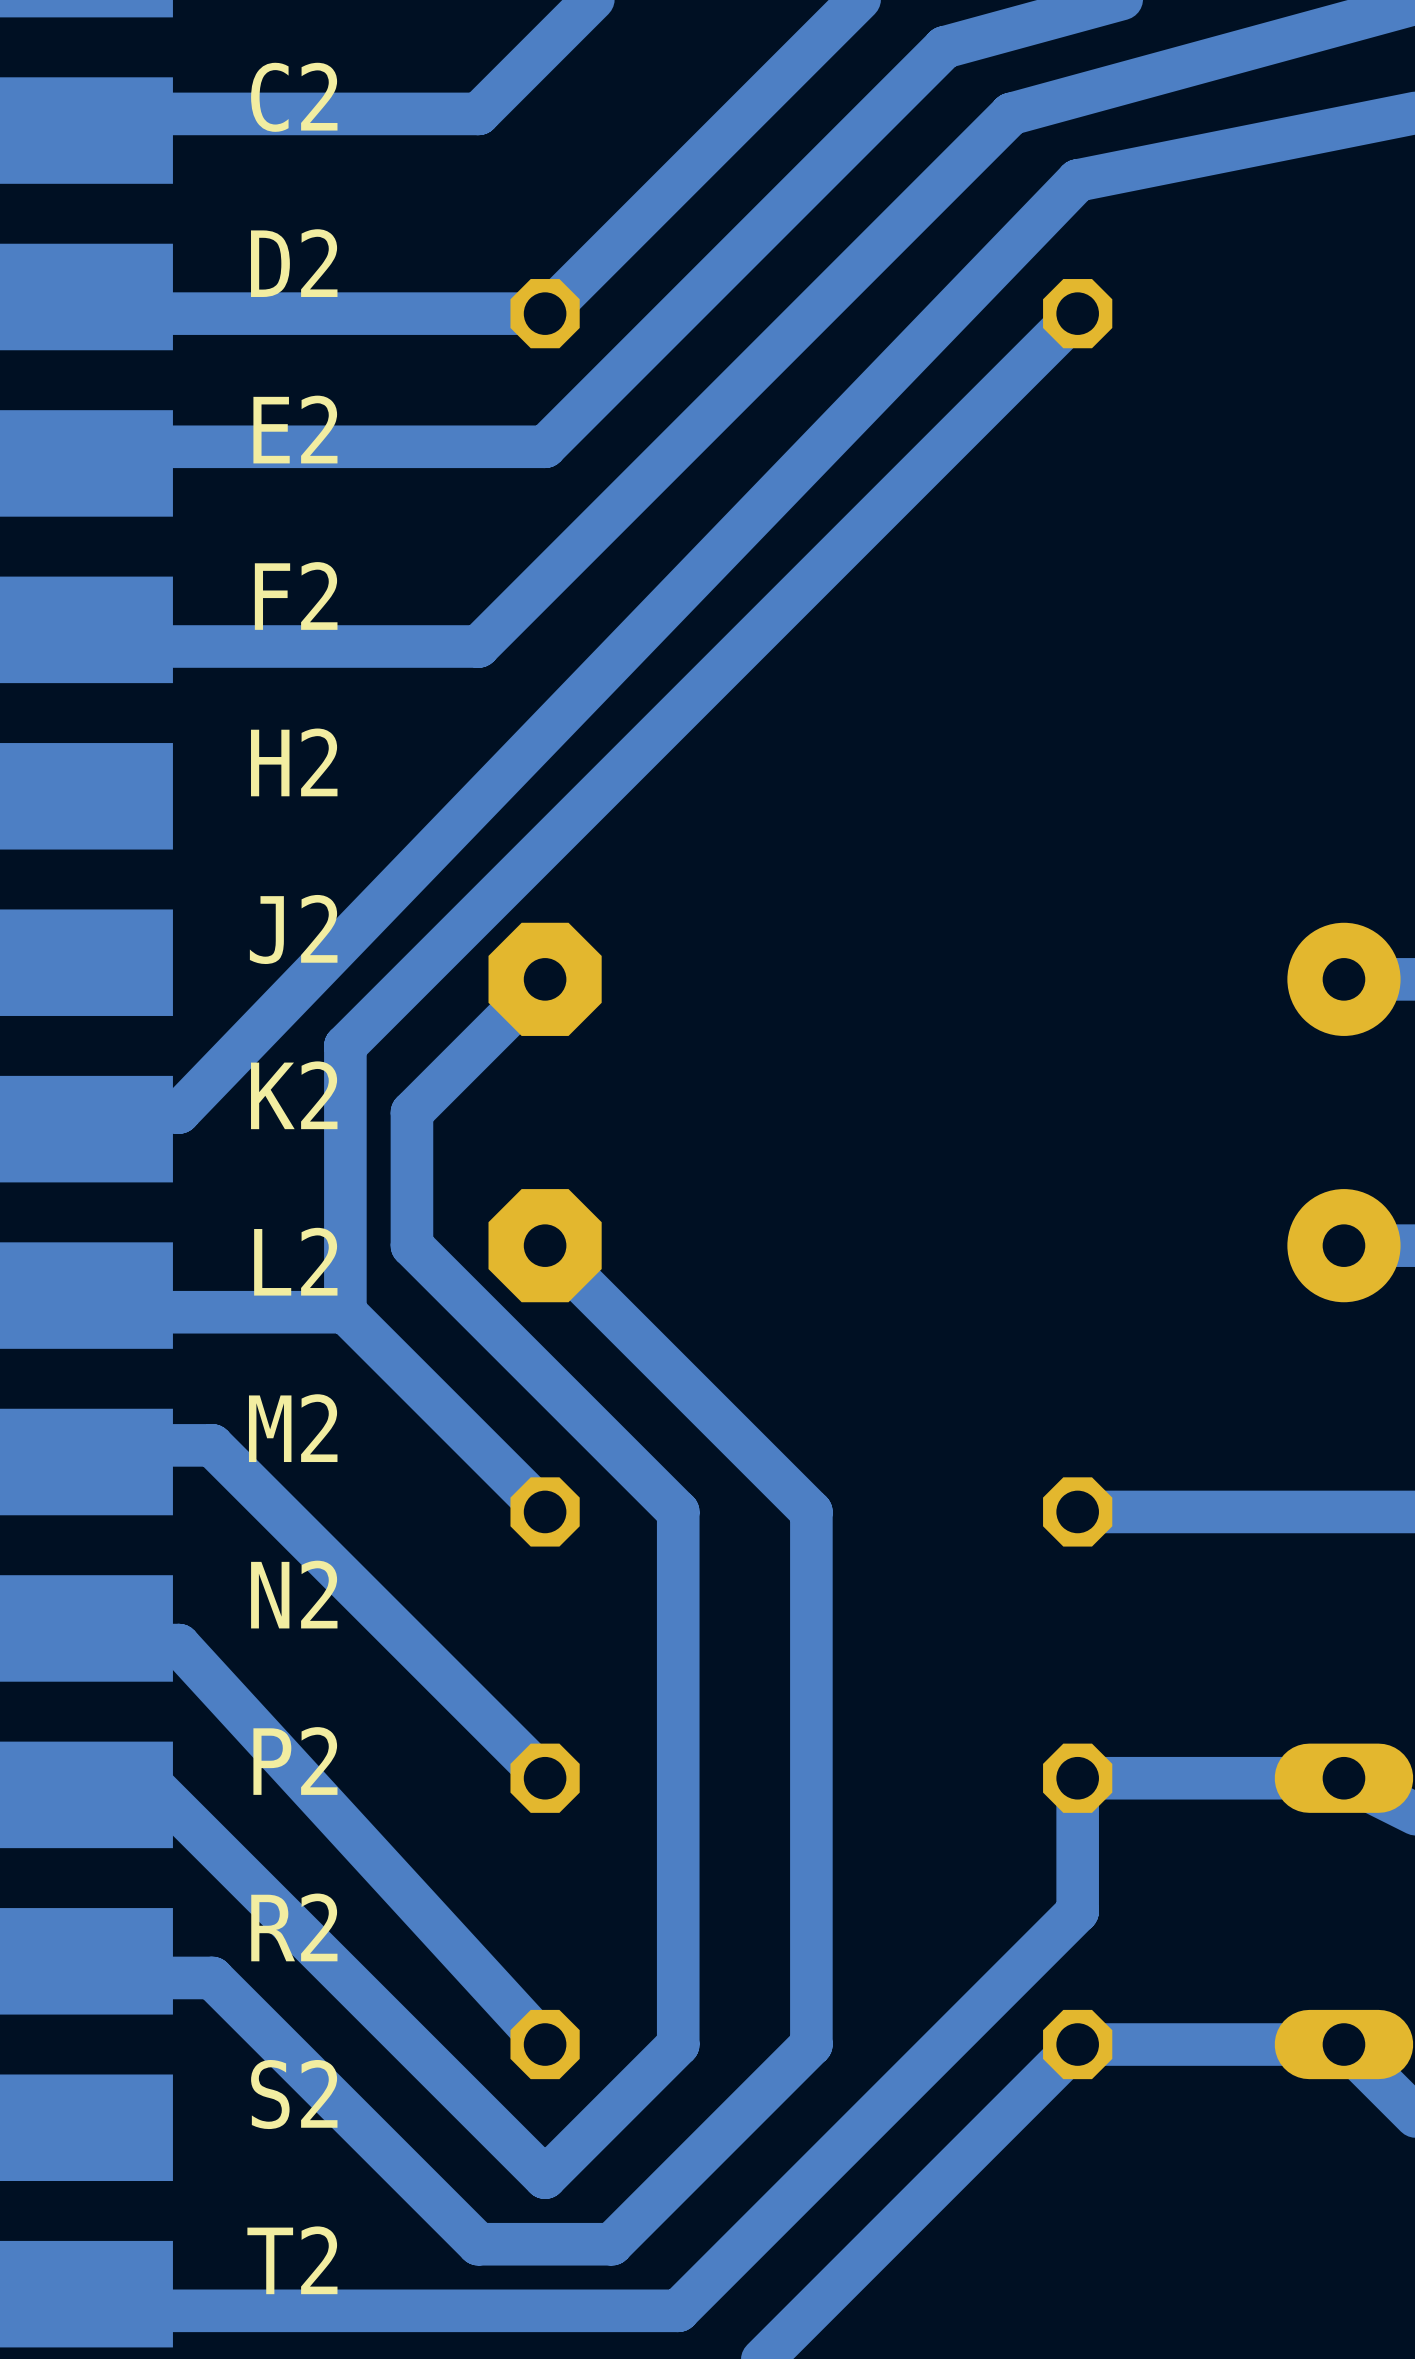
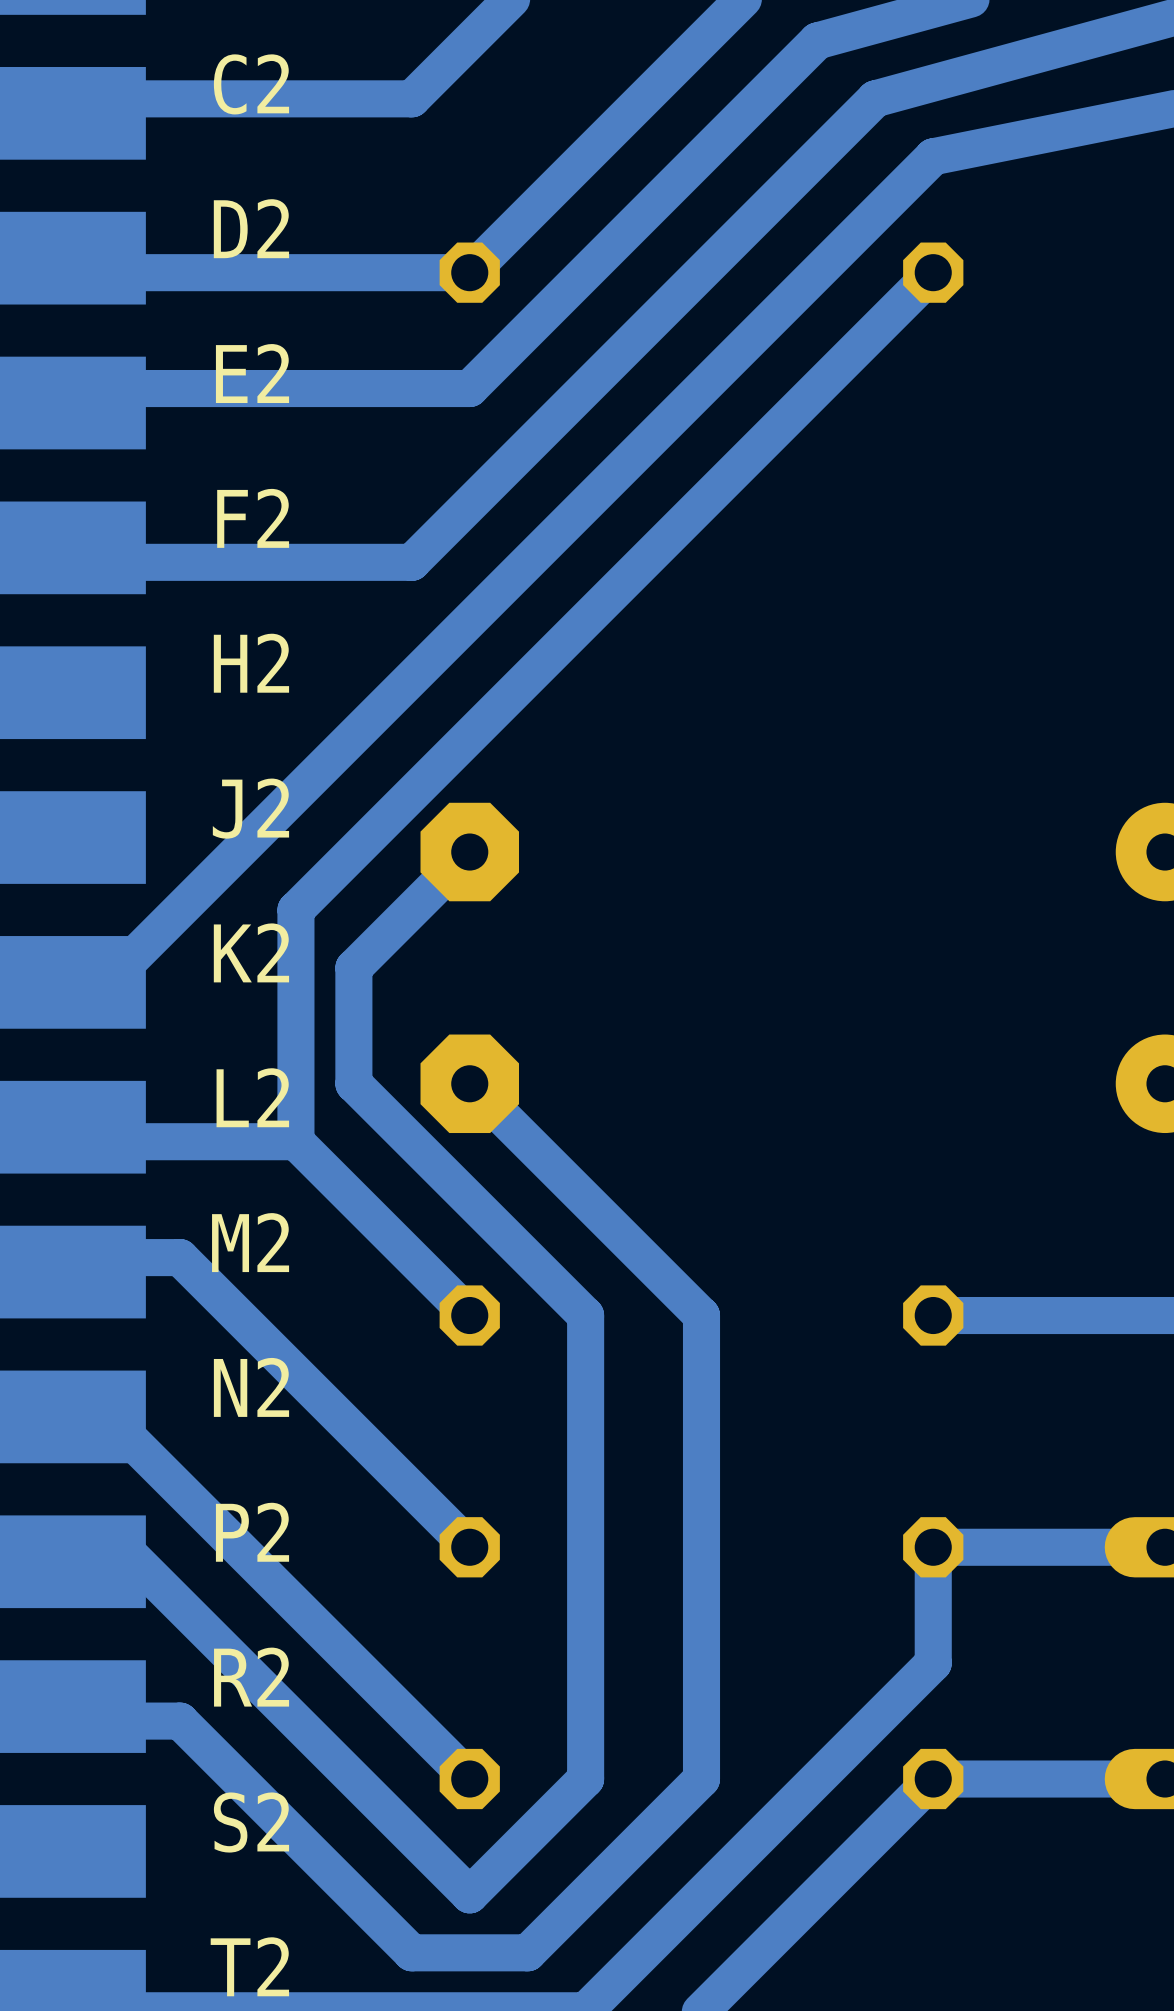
track: (1077, 180) (178, 1112) (145, 1112) -> (933, 156) (122, 967)
track: (145, 1645) (178, 1645) (545, 2044) -> (122, 1431) (469, 1779)

